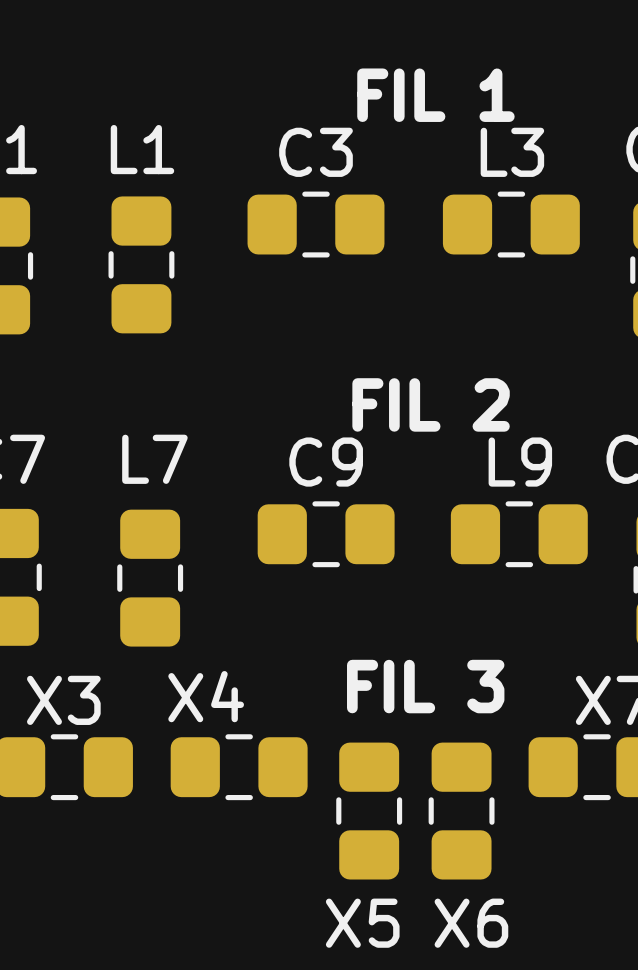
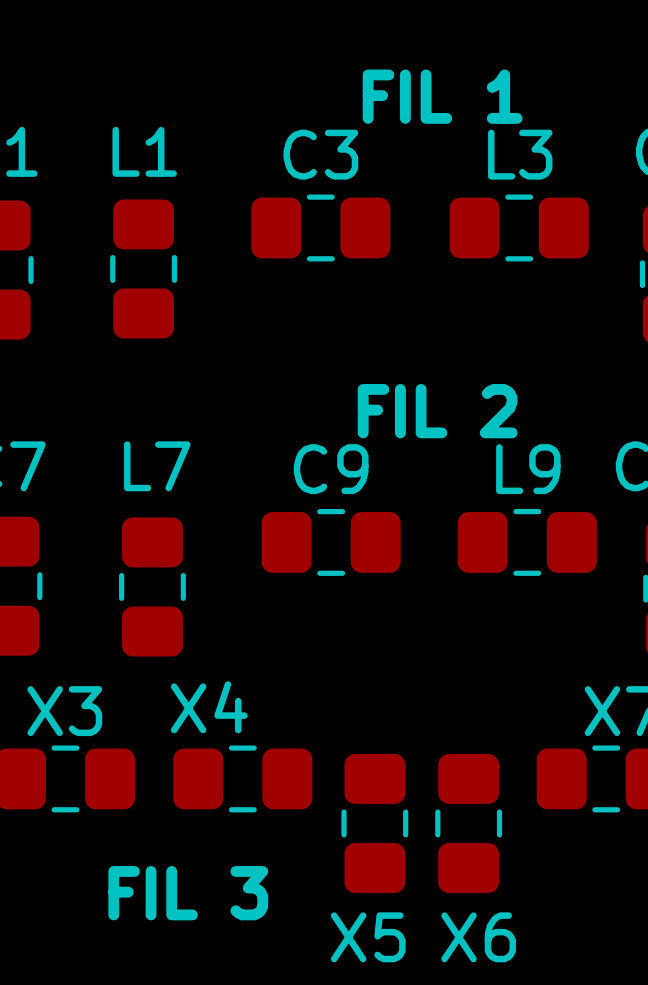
text position: FIL 3 (425, 686) -> FIL 3 (188, 893)

